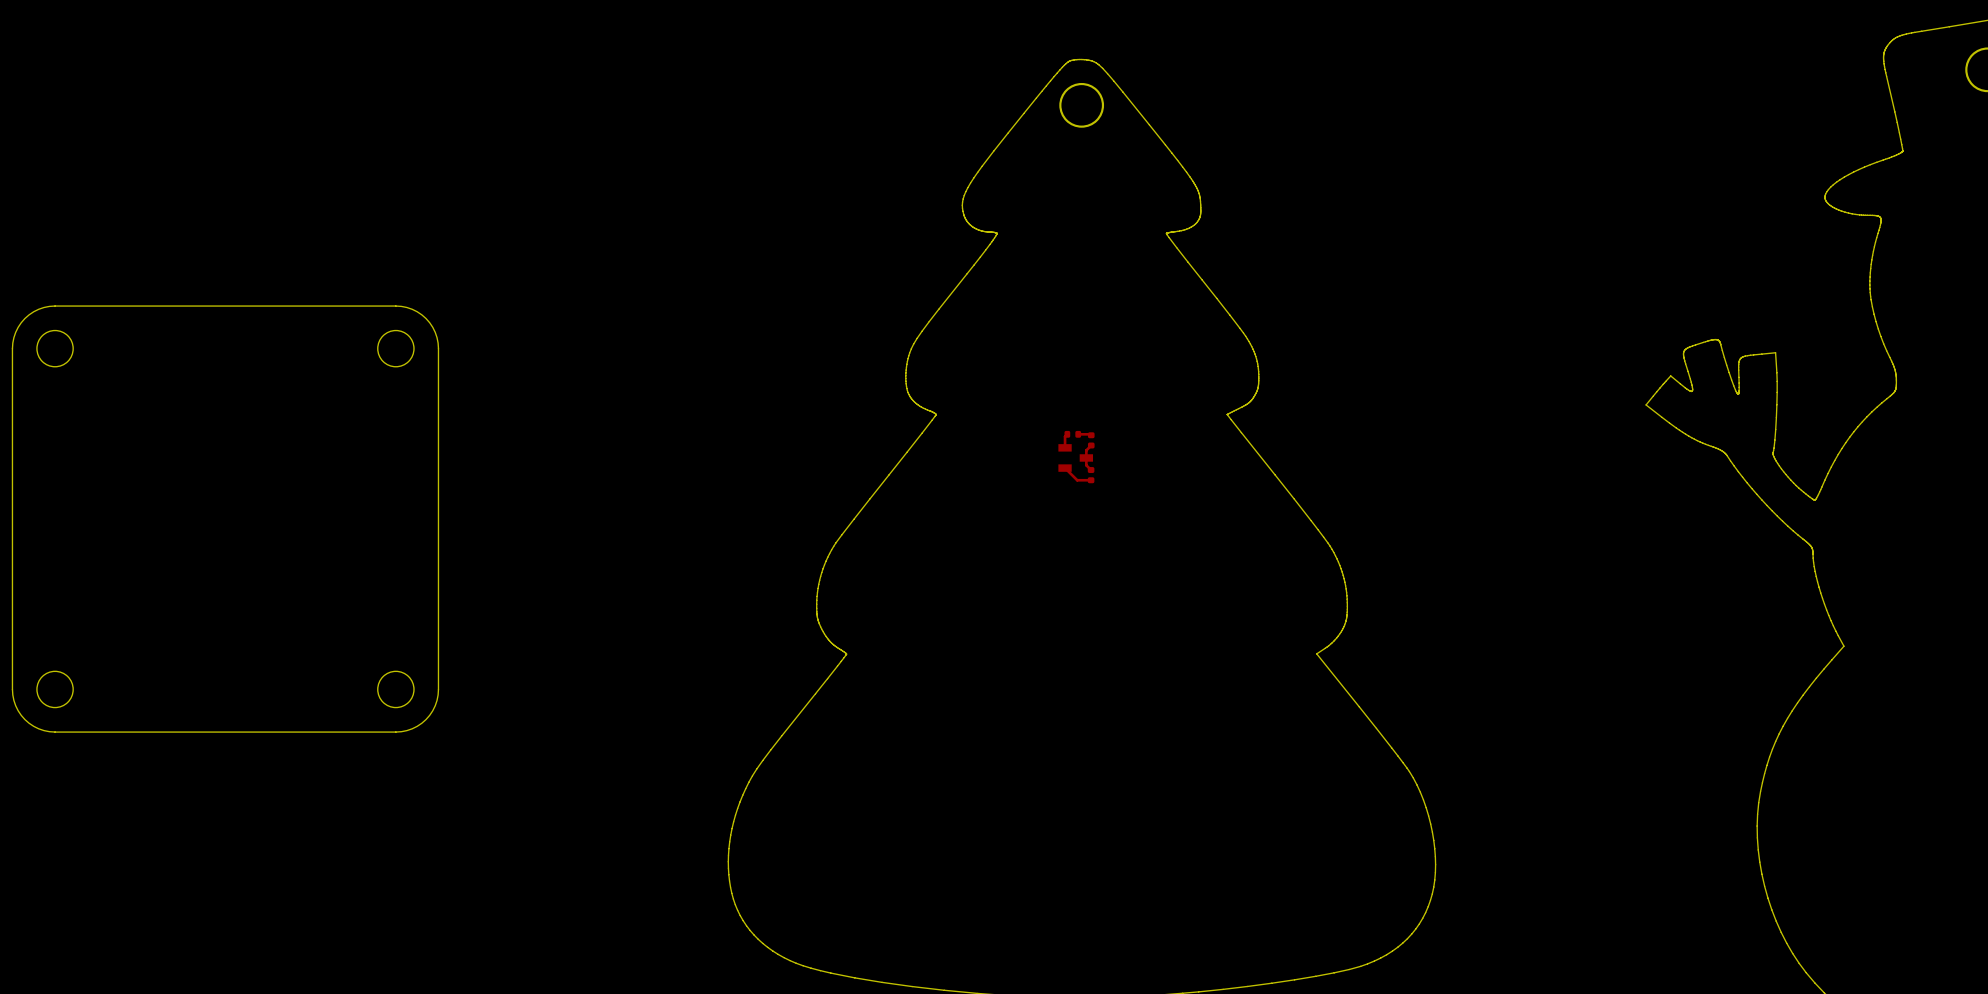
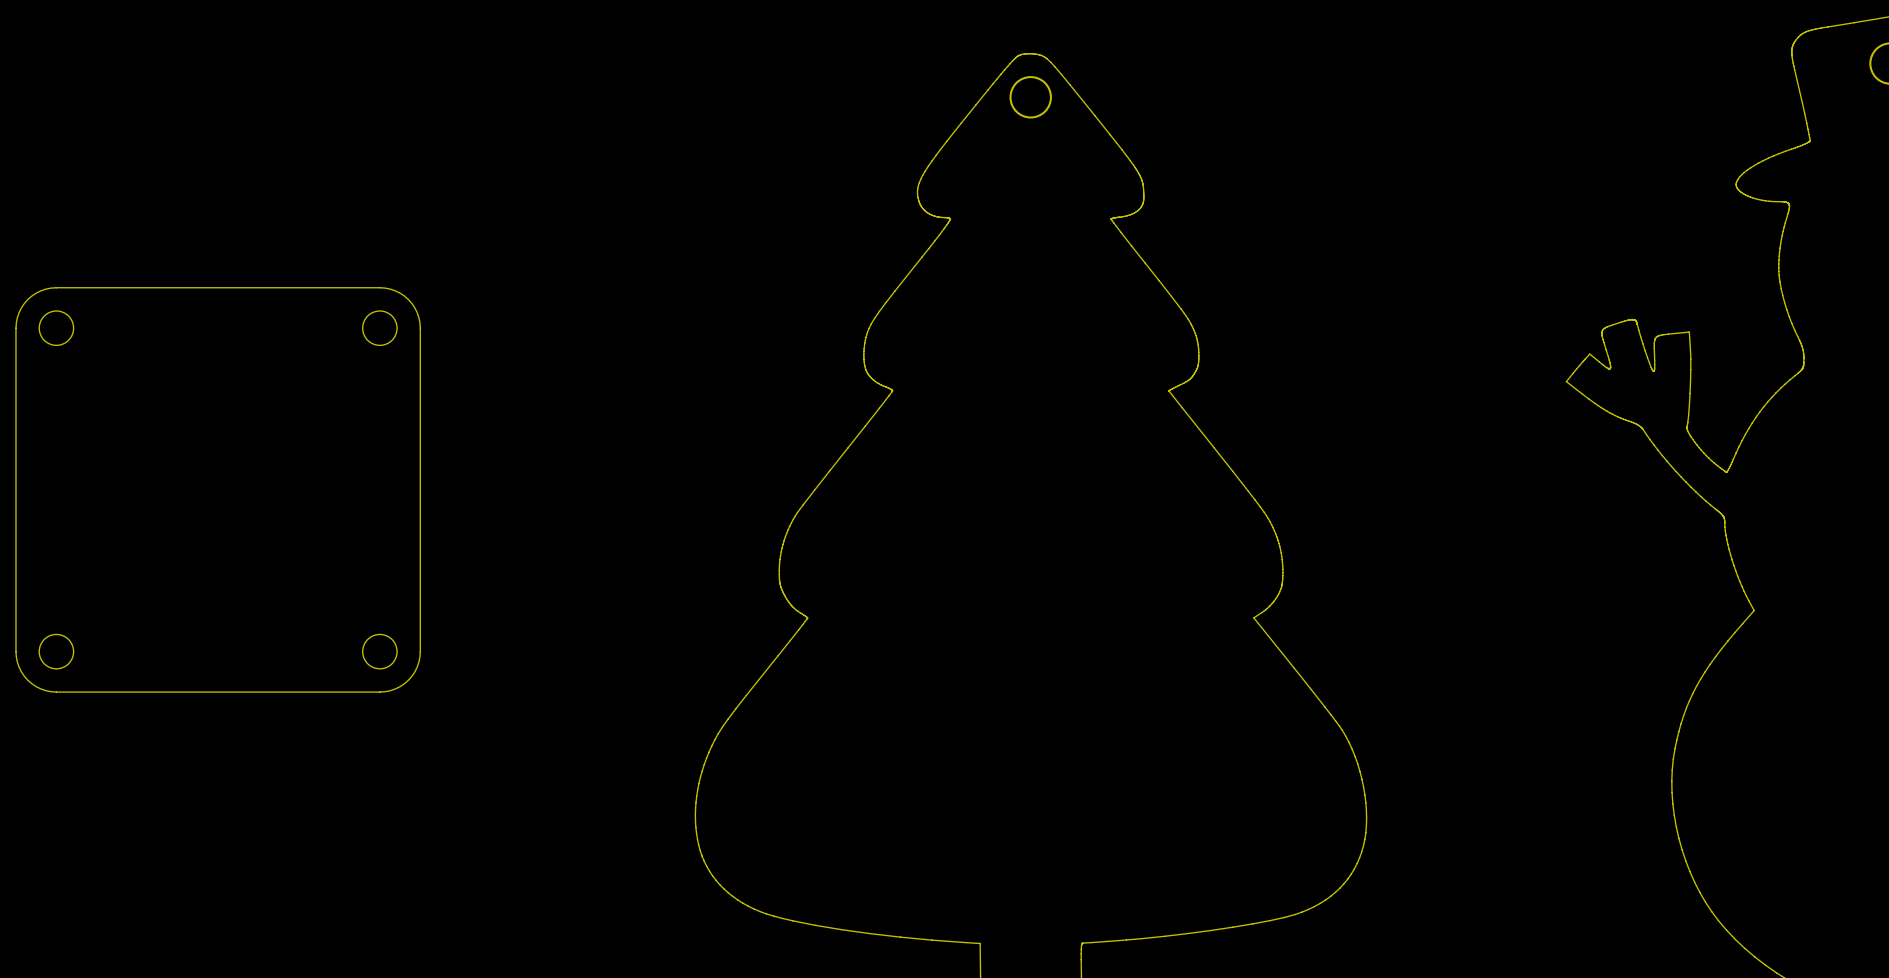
top track: (1067, 434) (1065, 436) (1065, 447) -> none
part: (1072, 434) -> none
top track: (1078, 434) (1091, 435) -> none
part: (1091, 440) -> none
top track: (1091, 445) (1086, 450) (1086, 465) (1091, 470) -> none
part: (1075, 457) -> none
top track: (1065, 468) (1077, 480) (1091, 480) -> none
part: (1091, 475) -> none

